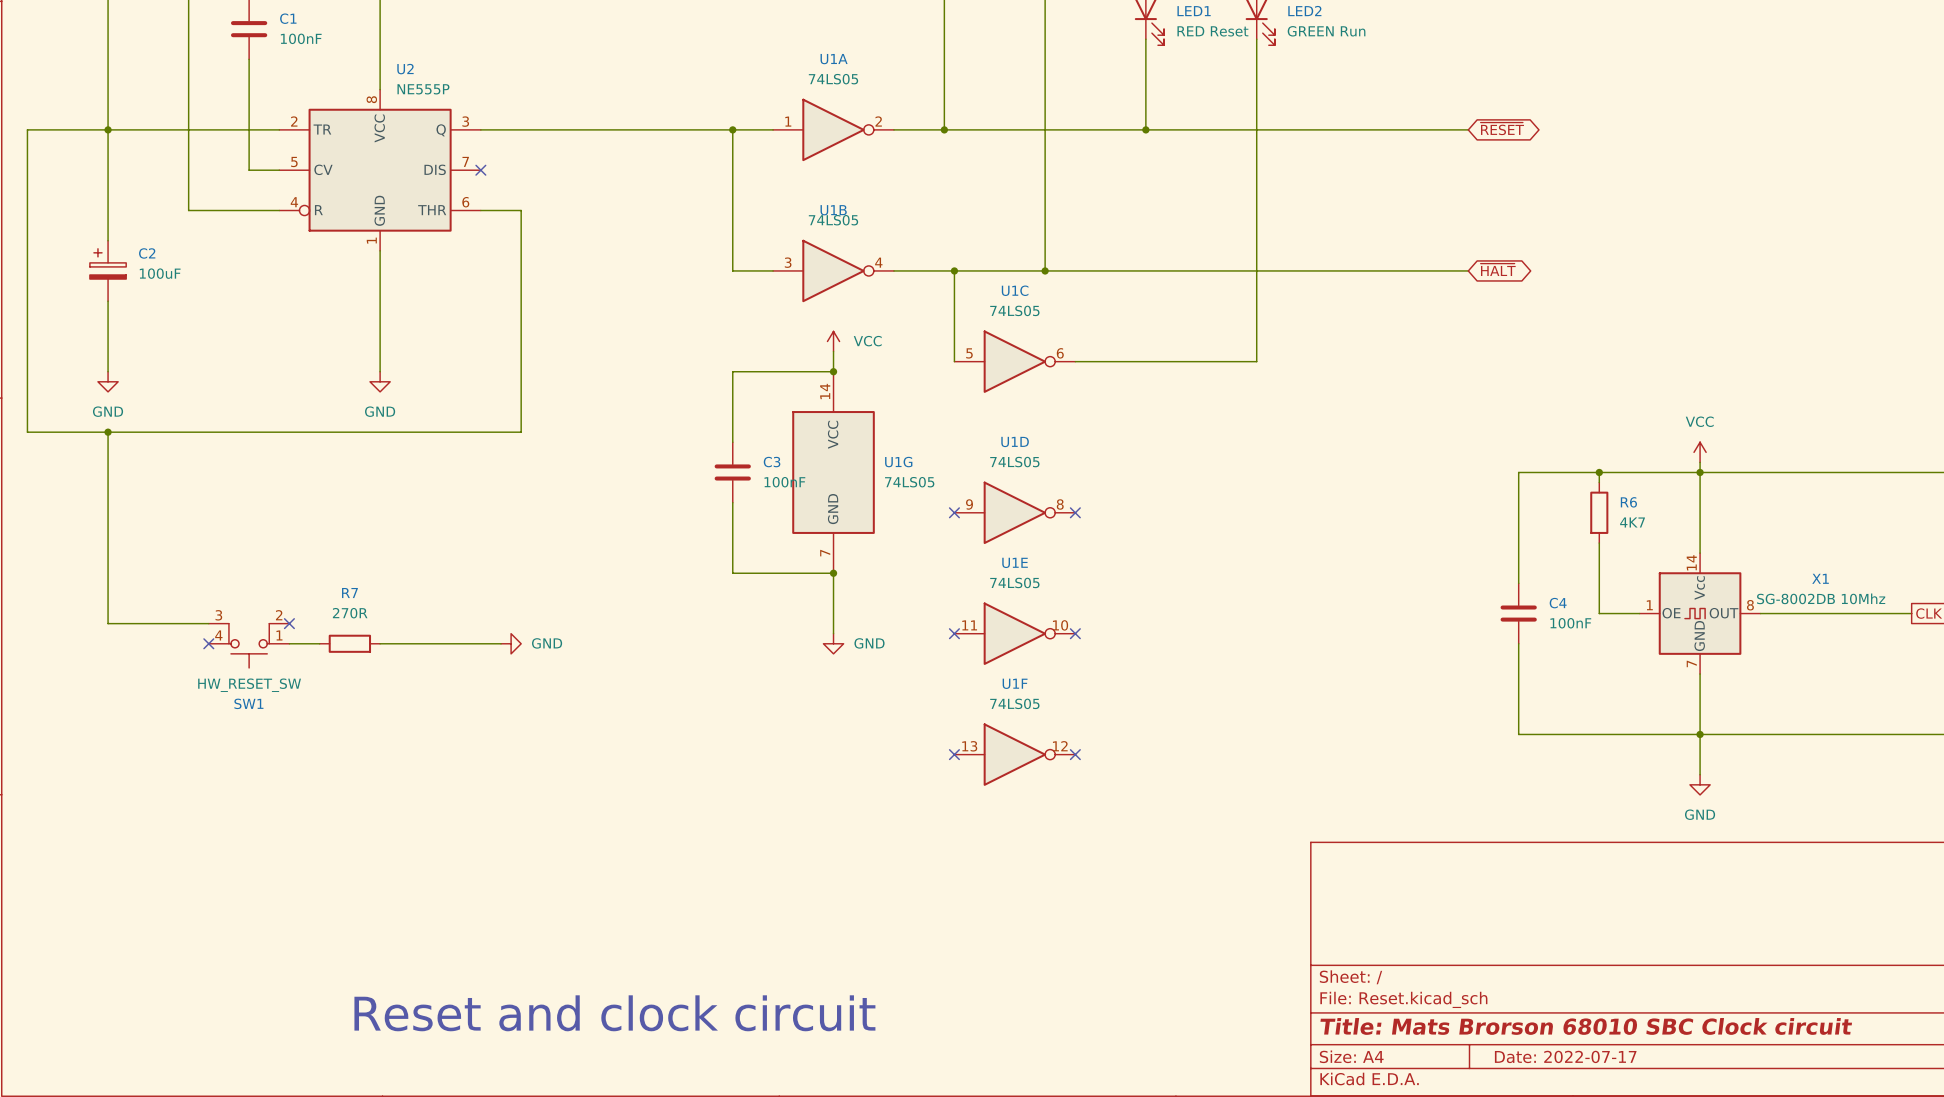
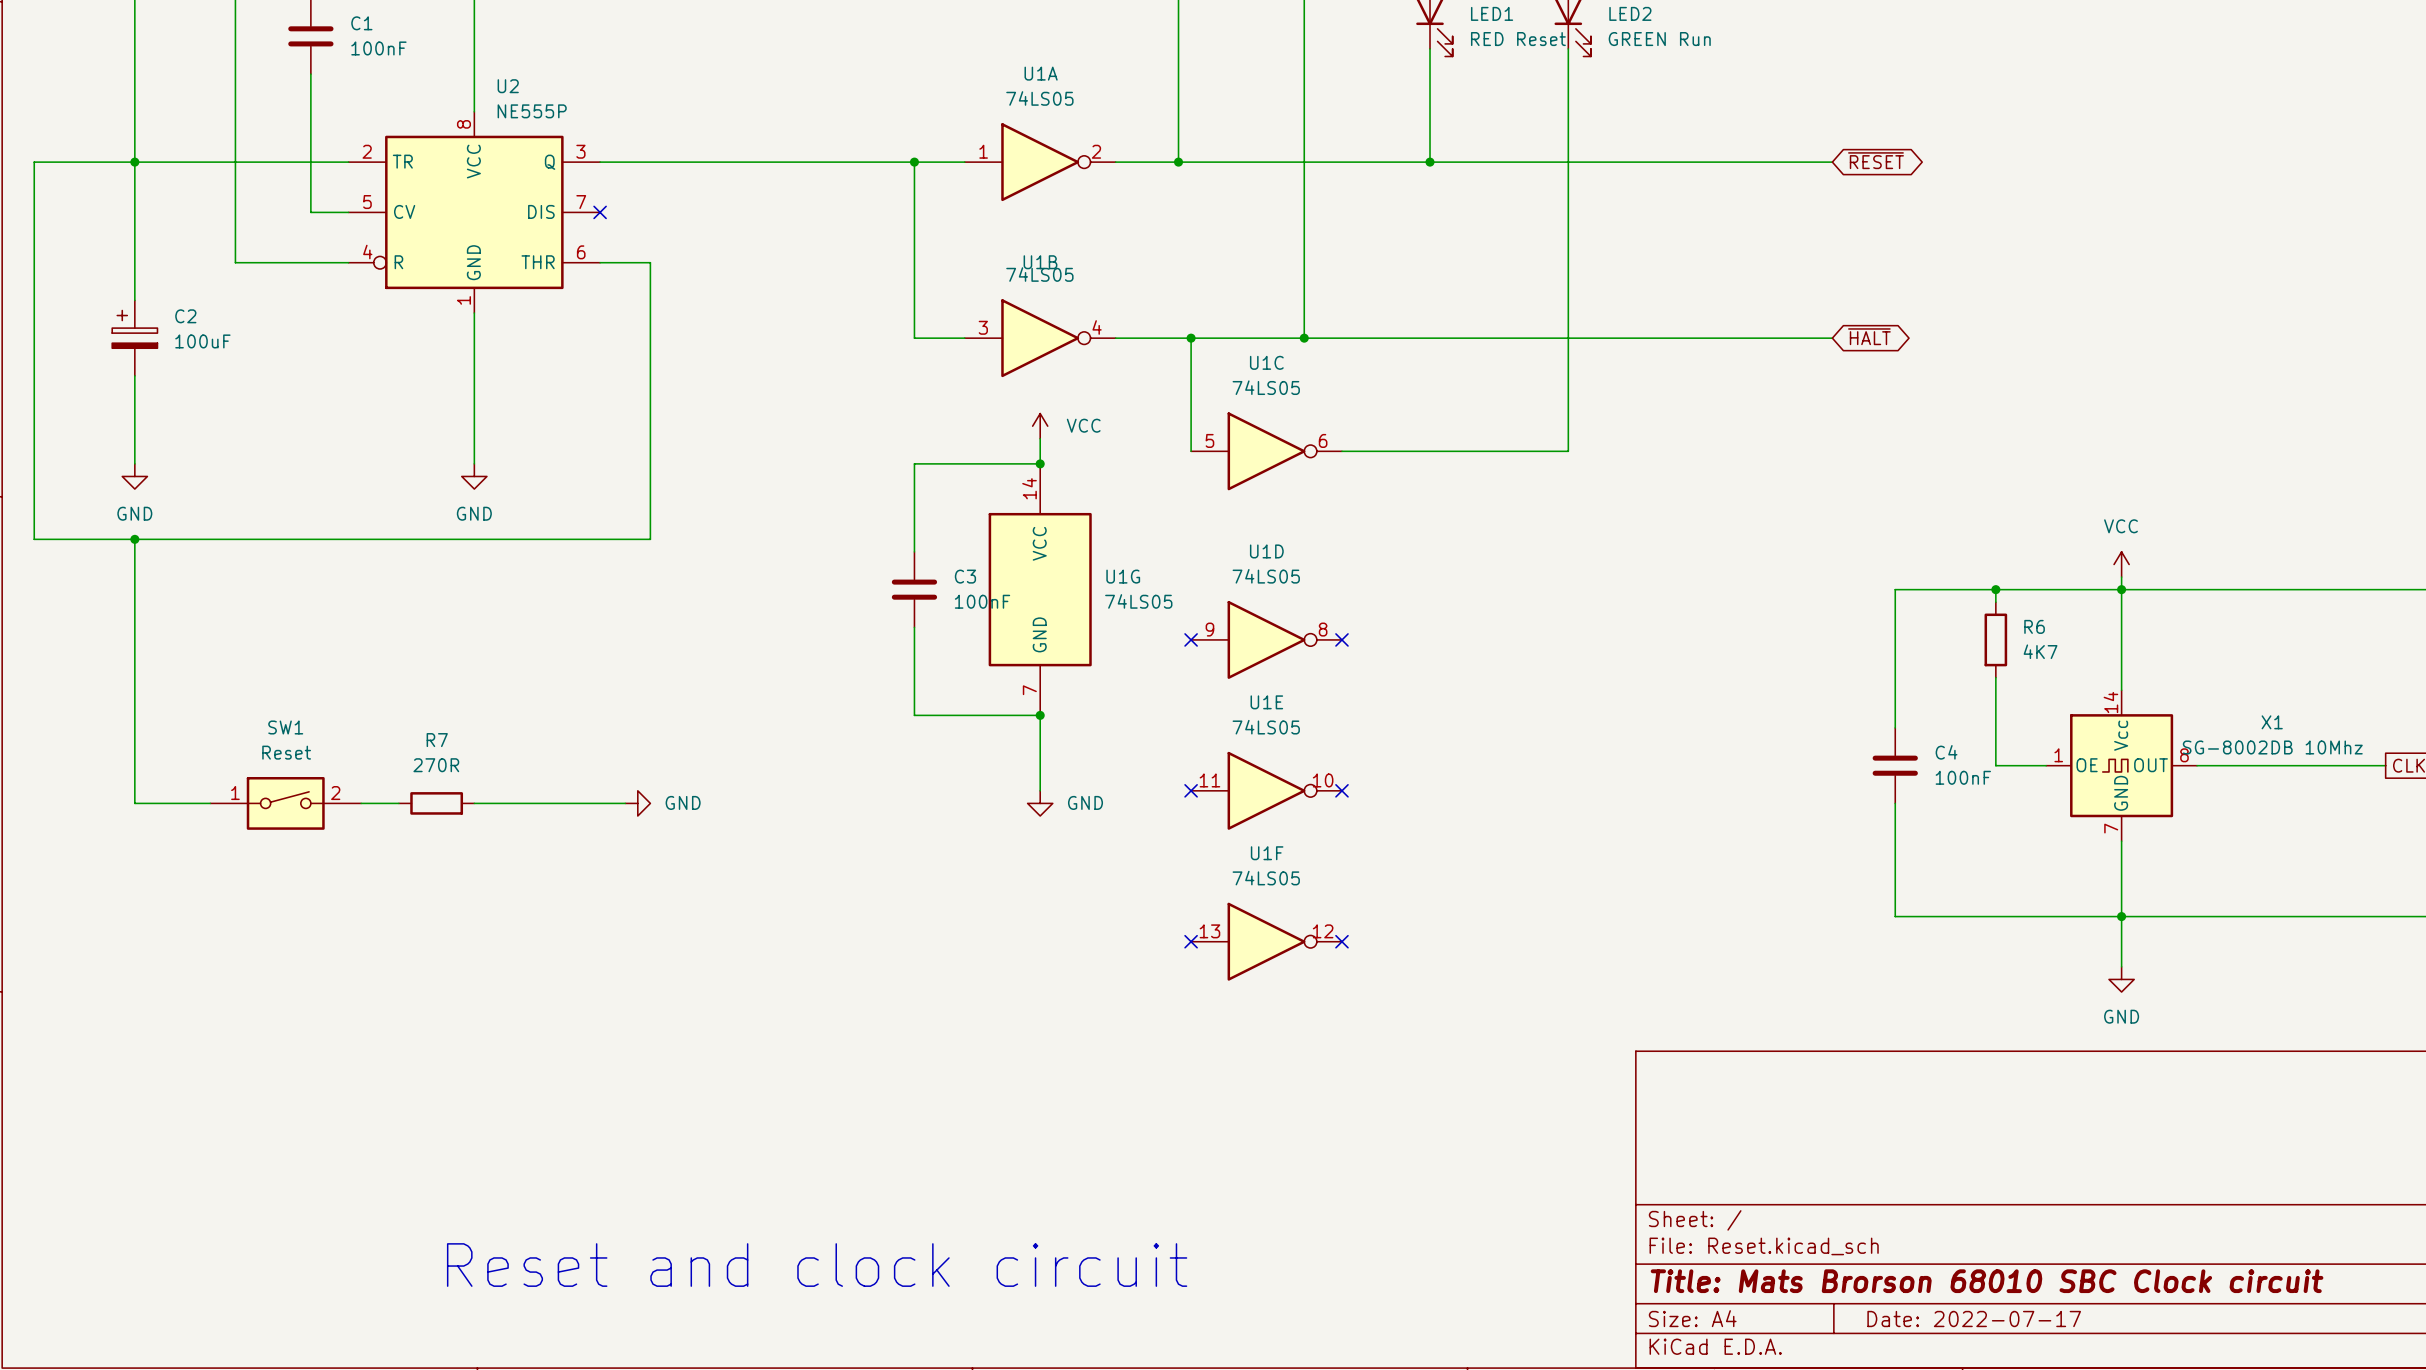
wire: (108, 623) (208, 623) -> (134, 778) (134, 803) (210, 803)
SW1 symbol: [208, 623, 290, 668] -> [210, 777, 362, 830]
no-connect mark: (289, 623) -> none
no-connect mark: (208, 643) -> none
SW1 value: HW_RESET_SW (249, 685) -> Reset (286, 752)
SW1 name position: SW1 (248, 703) -> SW1 (285, 727)

